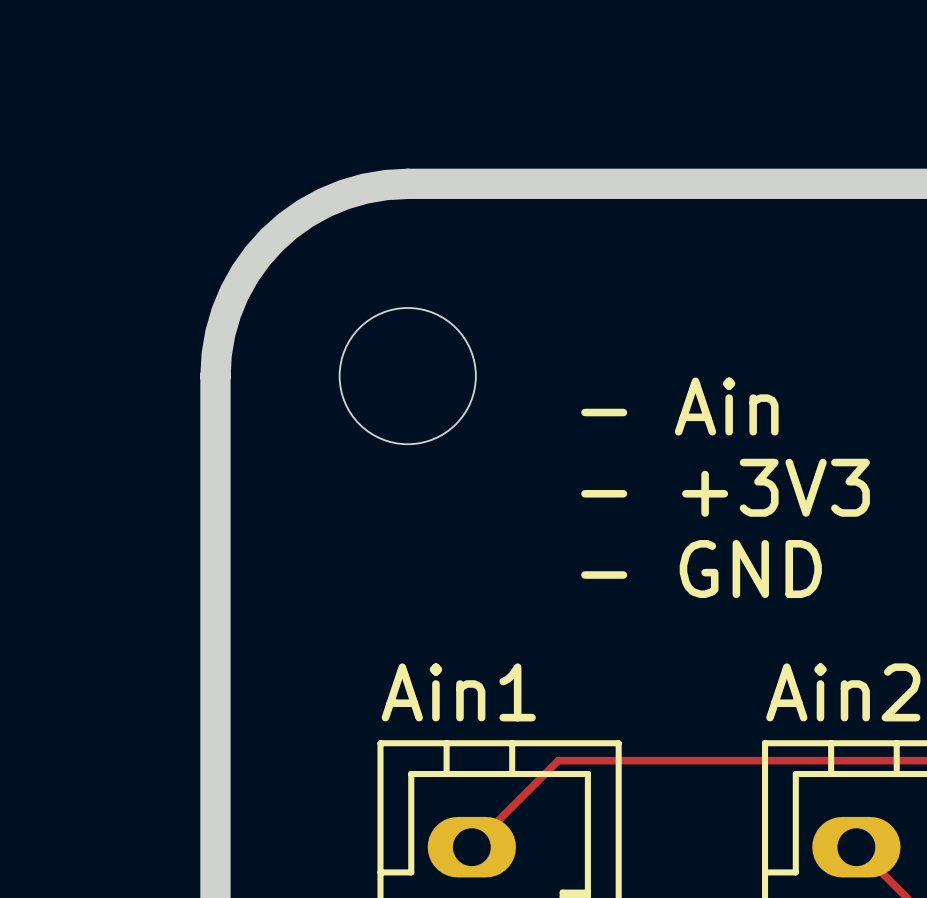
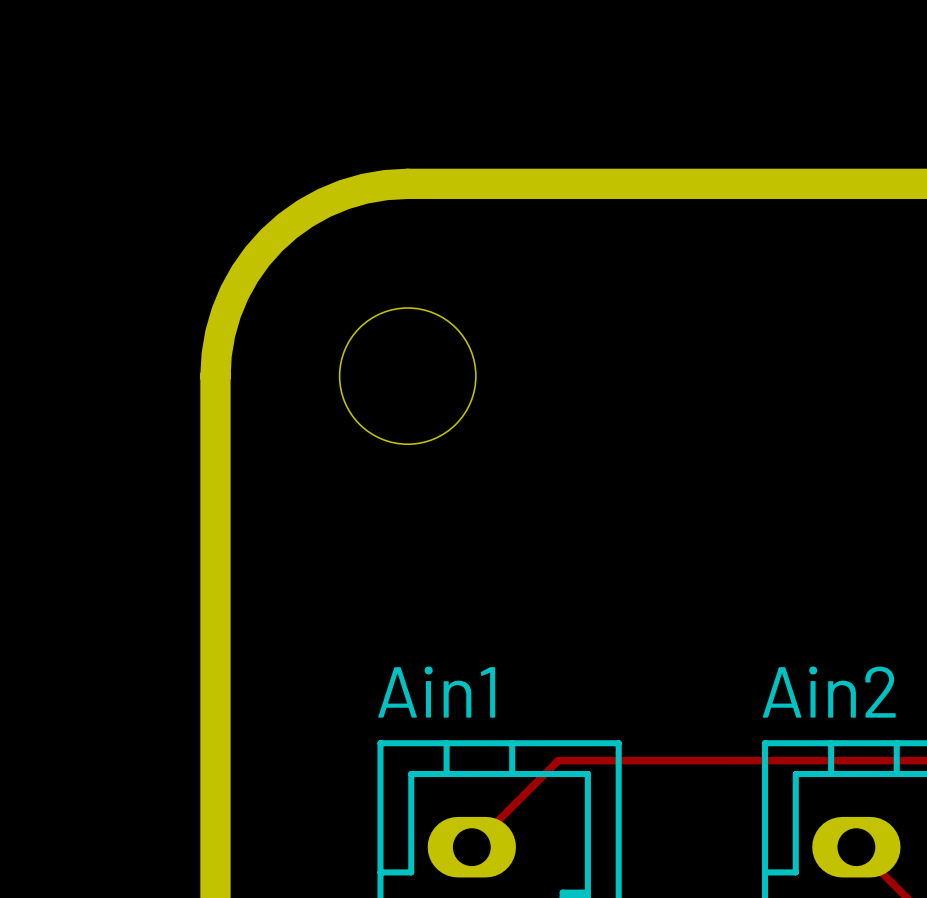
text: - Ain (679, 406) -> none
text: - +3V3 (725, 487) -> none
text: - GND (701, 569) -> none

